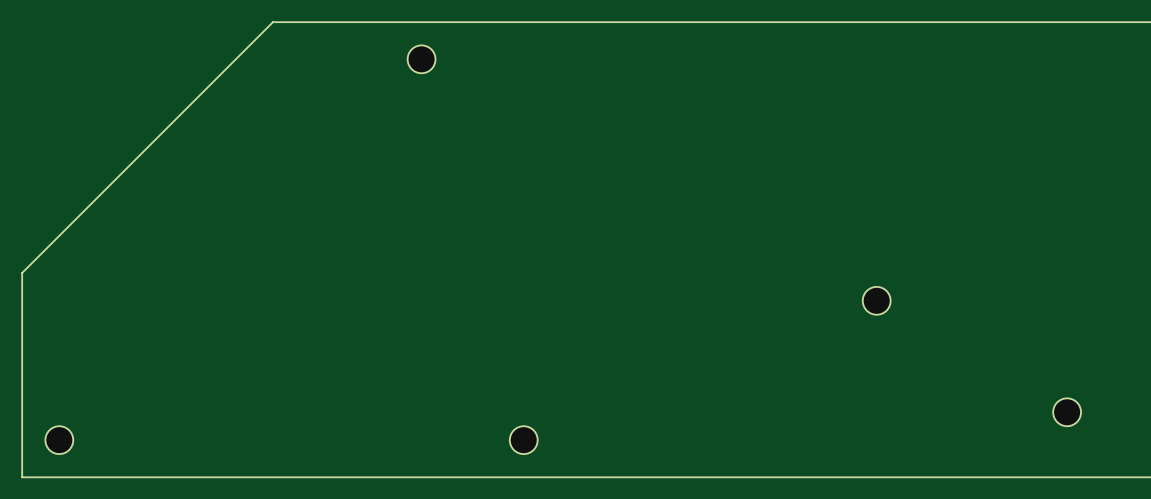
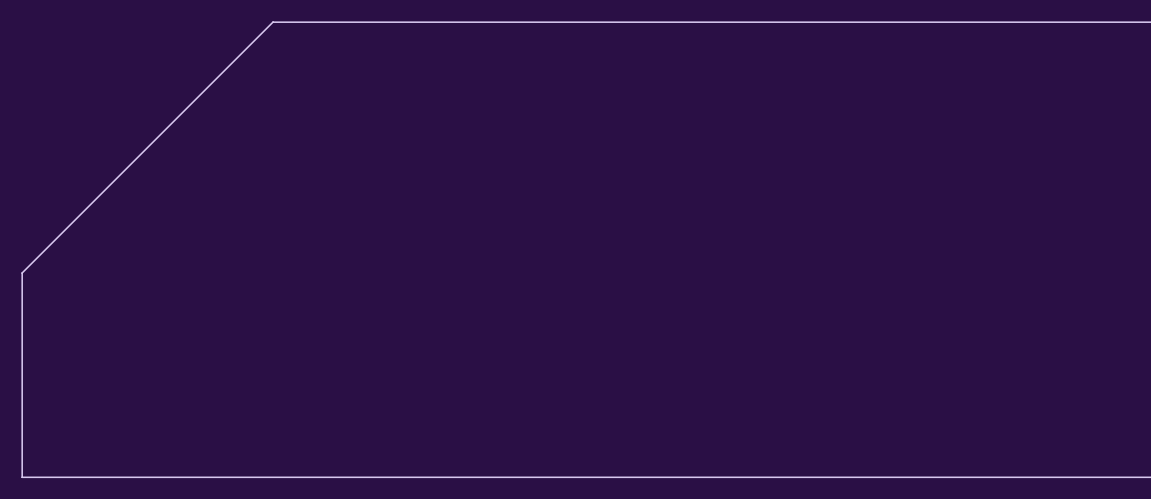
hole: (421, 59) -> none
hole: (876, 300) -> none
hole: (1067, 412) -> none
hole: (59, 440) -> none
hole: (523, 440) -> none

